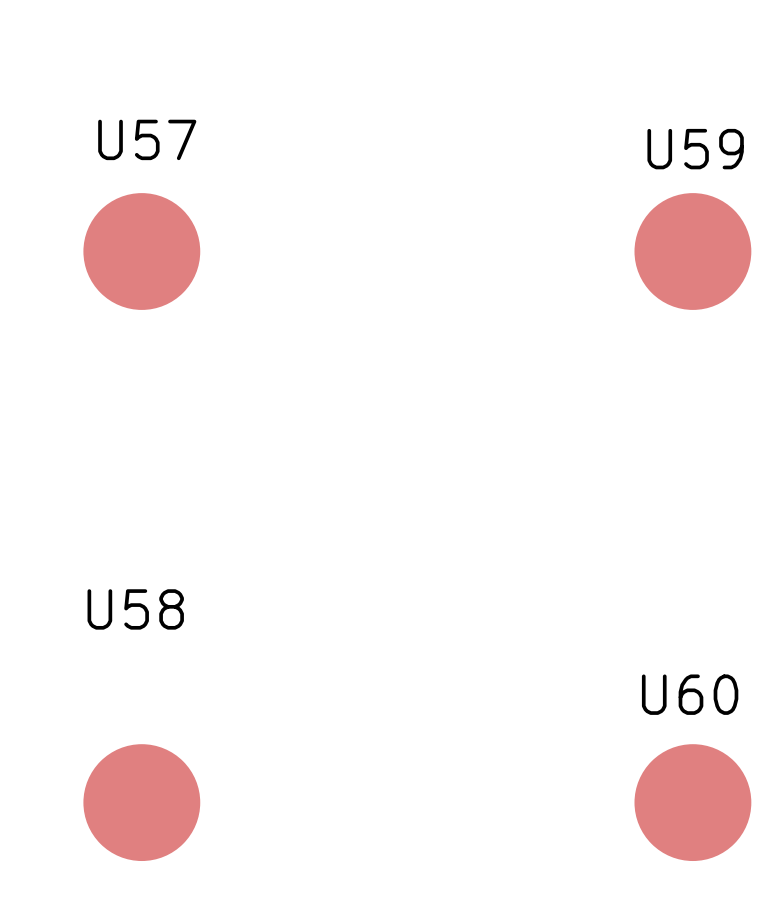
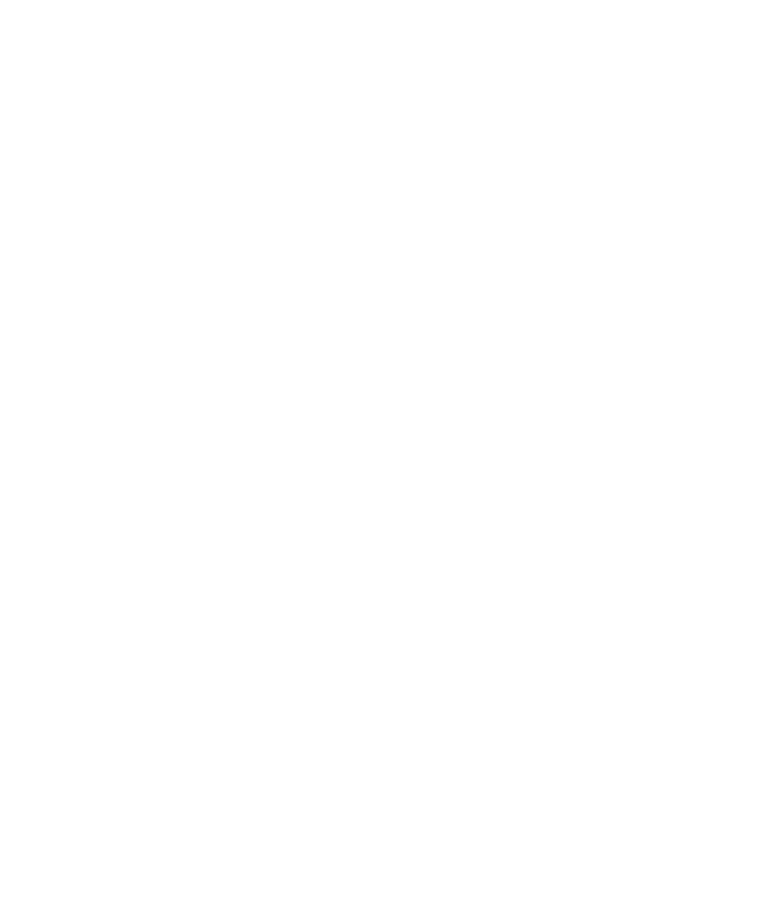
U57: (141, 251) -> none
U59: (692, 251) -> none
U58: (141, 802) -> none
U60: (692, 802) -> none

